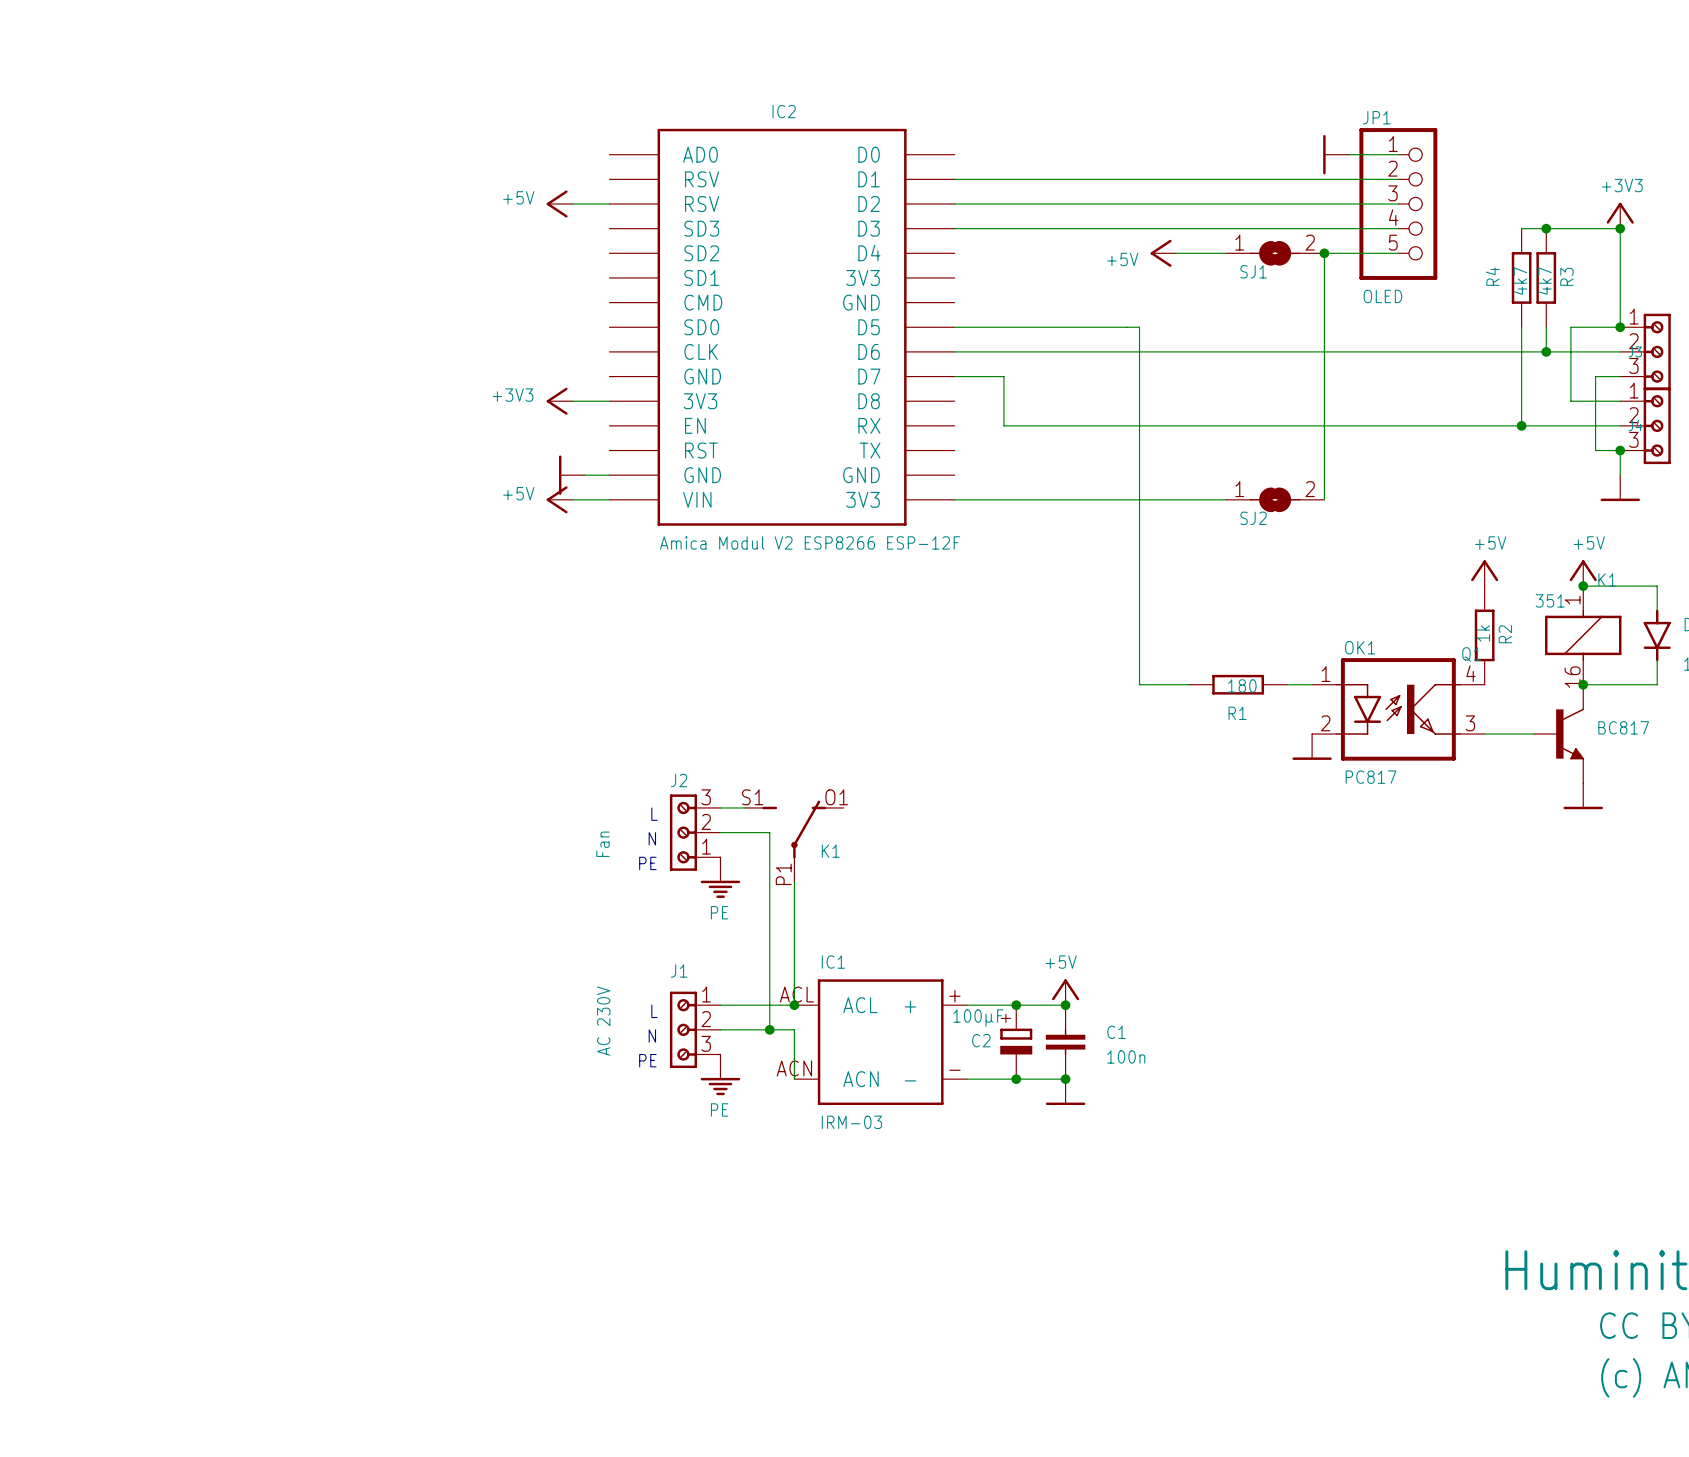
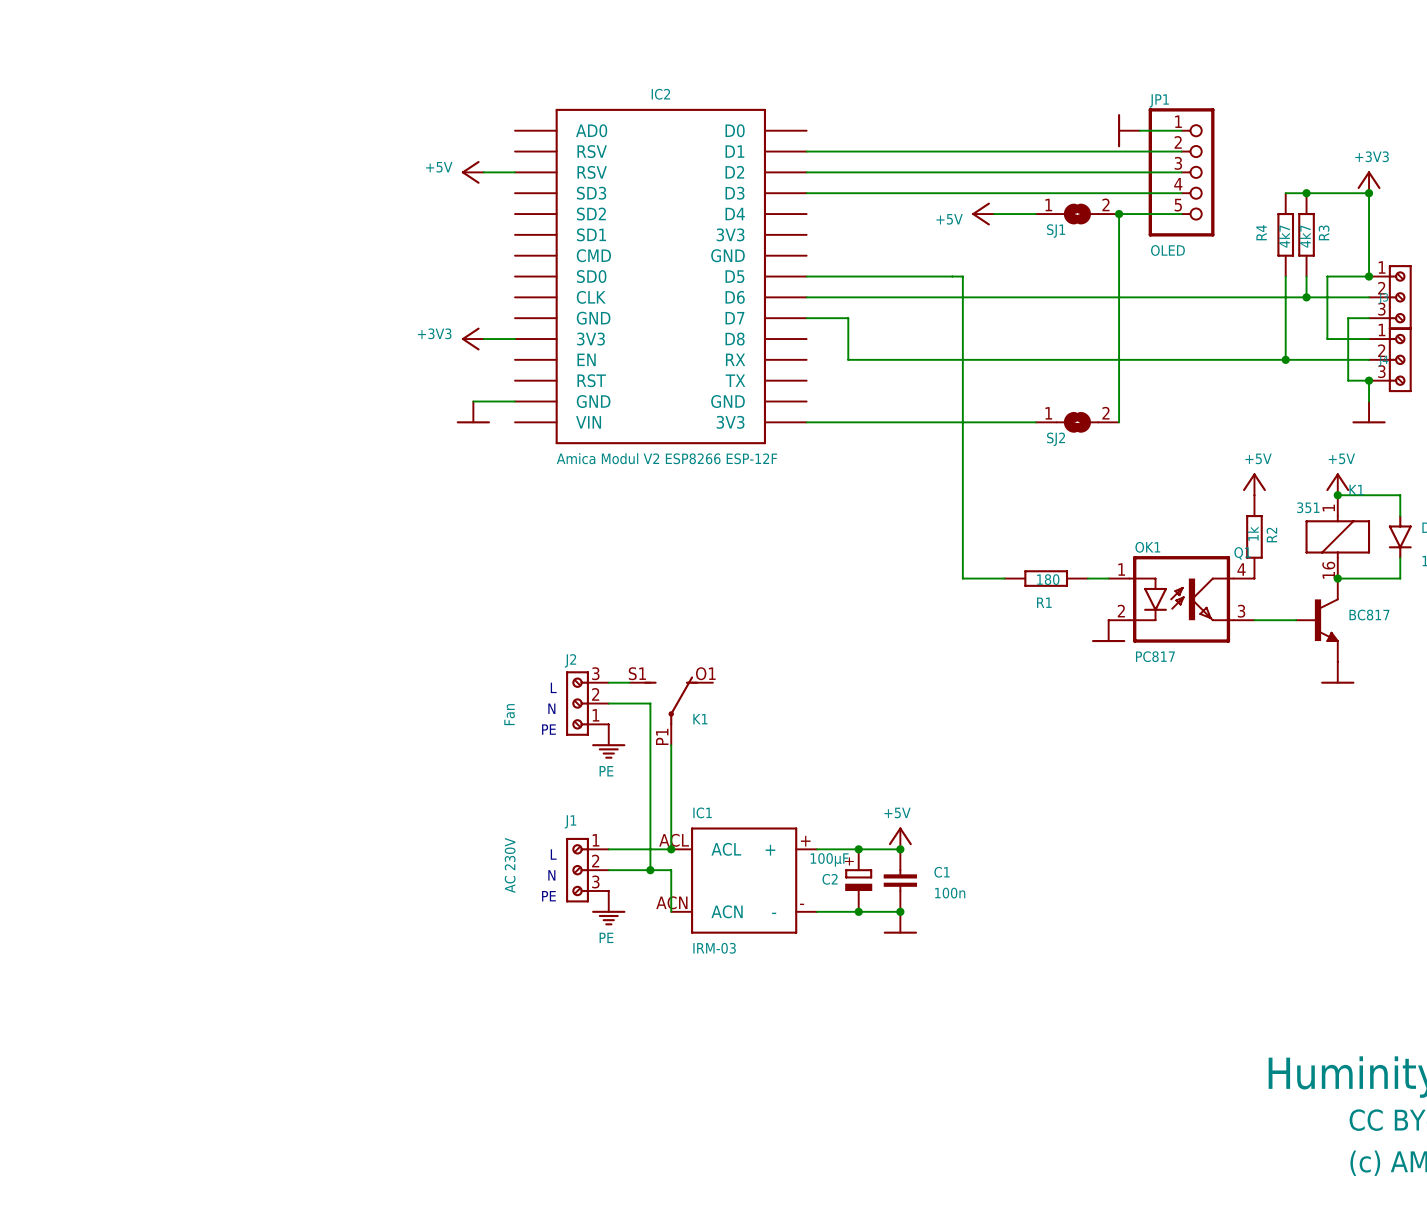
power symbol rotation: 0° (560, 475) -> 90° counterclockwise (473, 422)
power symbol: +5V (559, 499) -> none
wire: (572, 499) (609, 499) -> none

